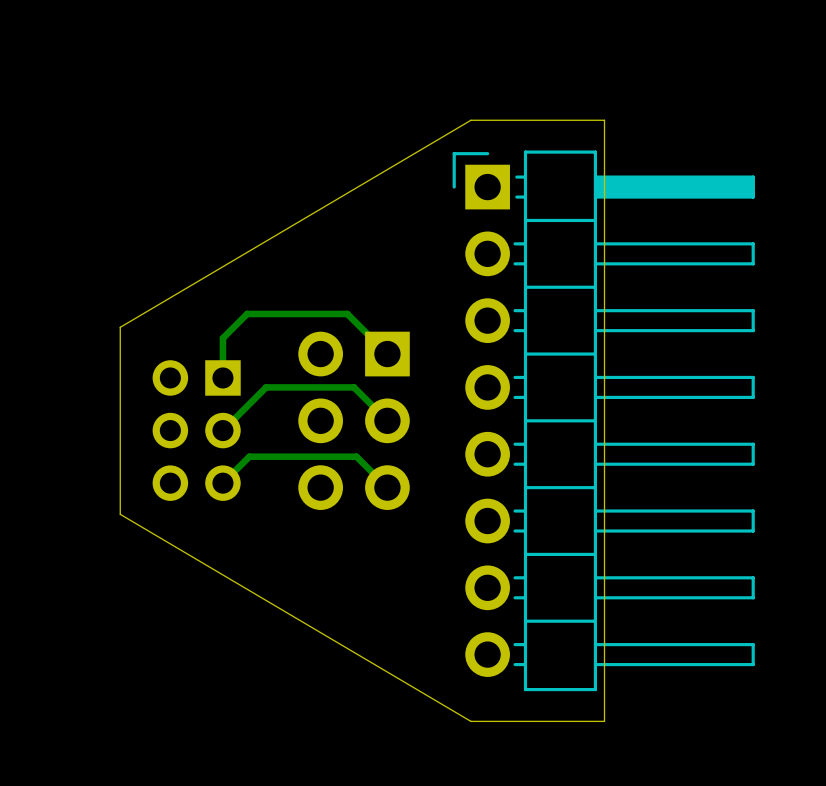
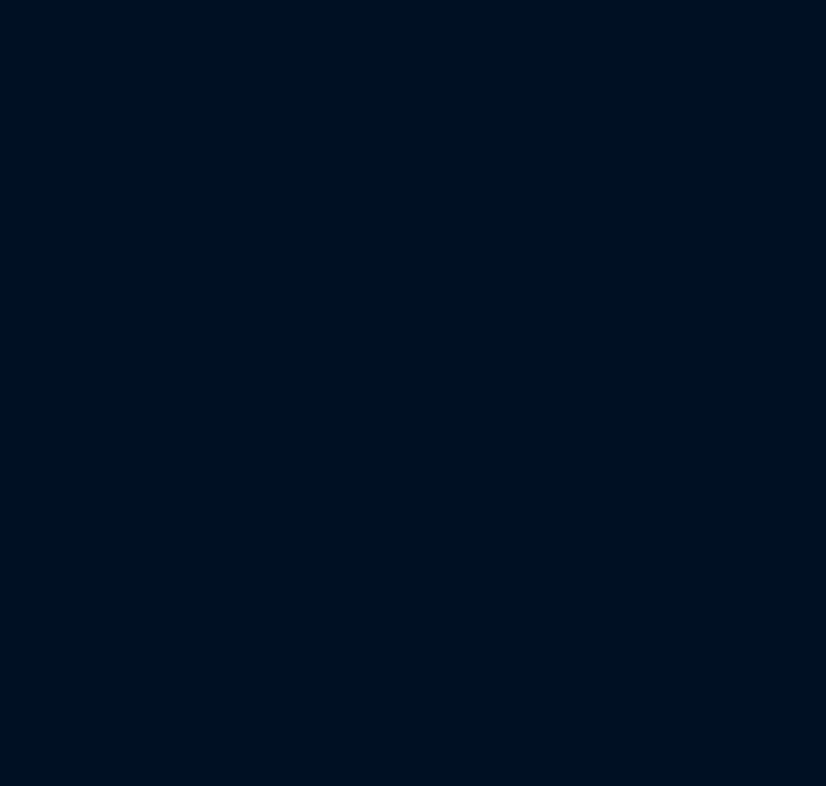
board edge: (604, 120) (470, 120) (120, 327) (120, 514) (470, 721) (604, 721) (604, 120) -> none
track: (387, 354) (347, 313) (247, 313) (222, 338) (222, 377) -> none
part: (354, 420) -> none
track: (387, 420) (354, 387) (266, 387) (222, 430) -> none
part: (603, 420) -> none
part: (196, 430) -> none
track: (222, 483) (249, 456) (356, 456) (387, 487) -> none

